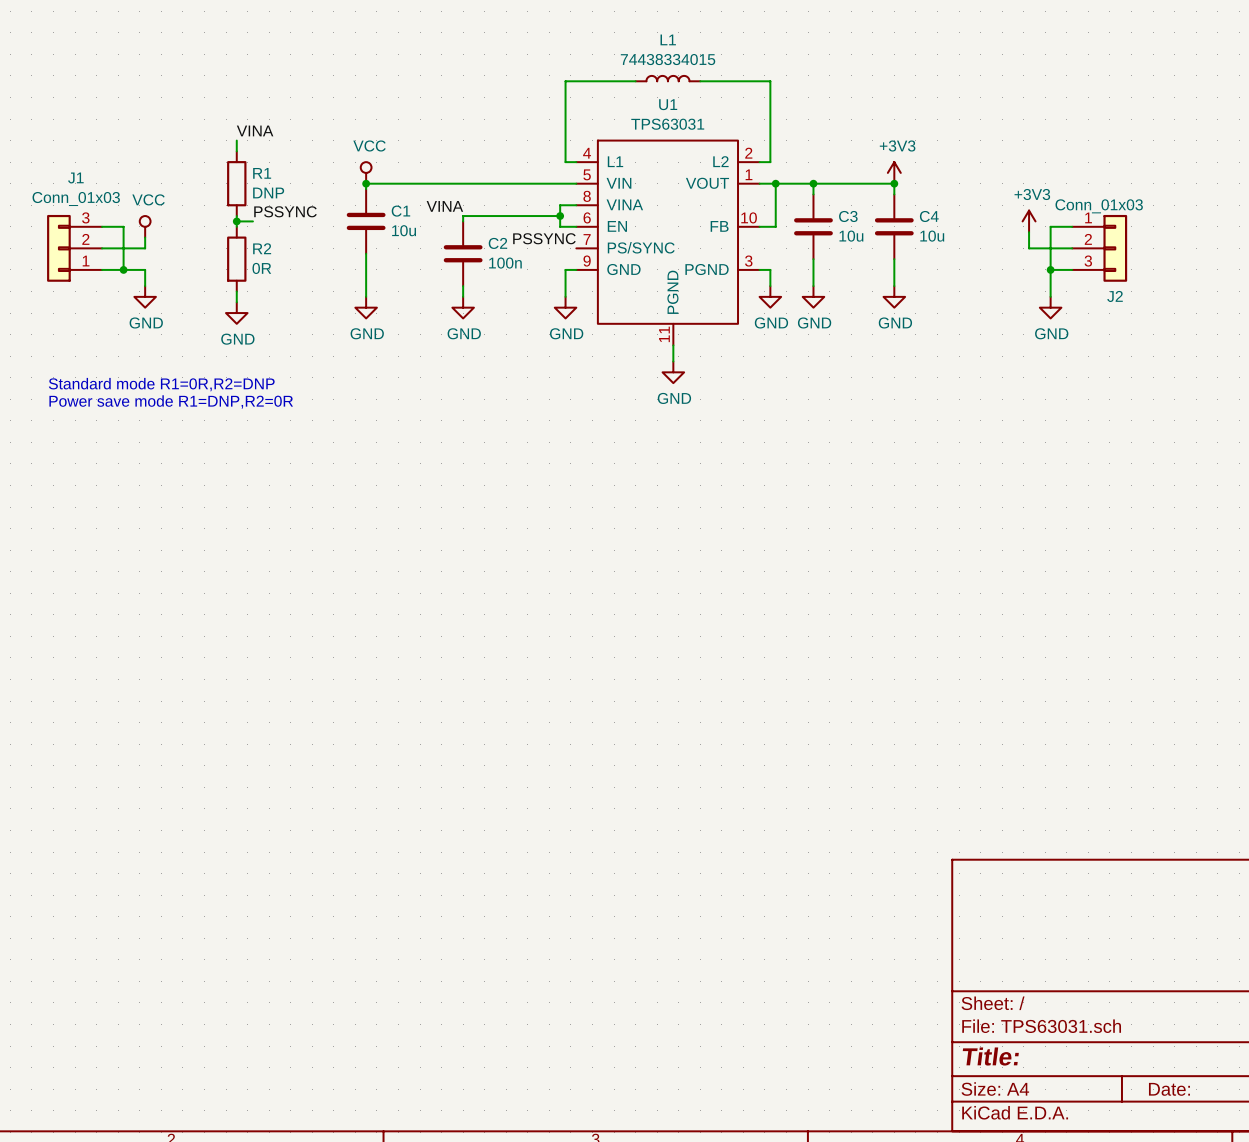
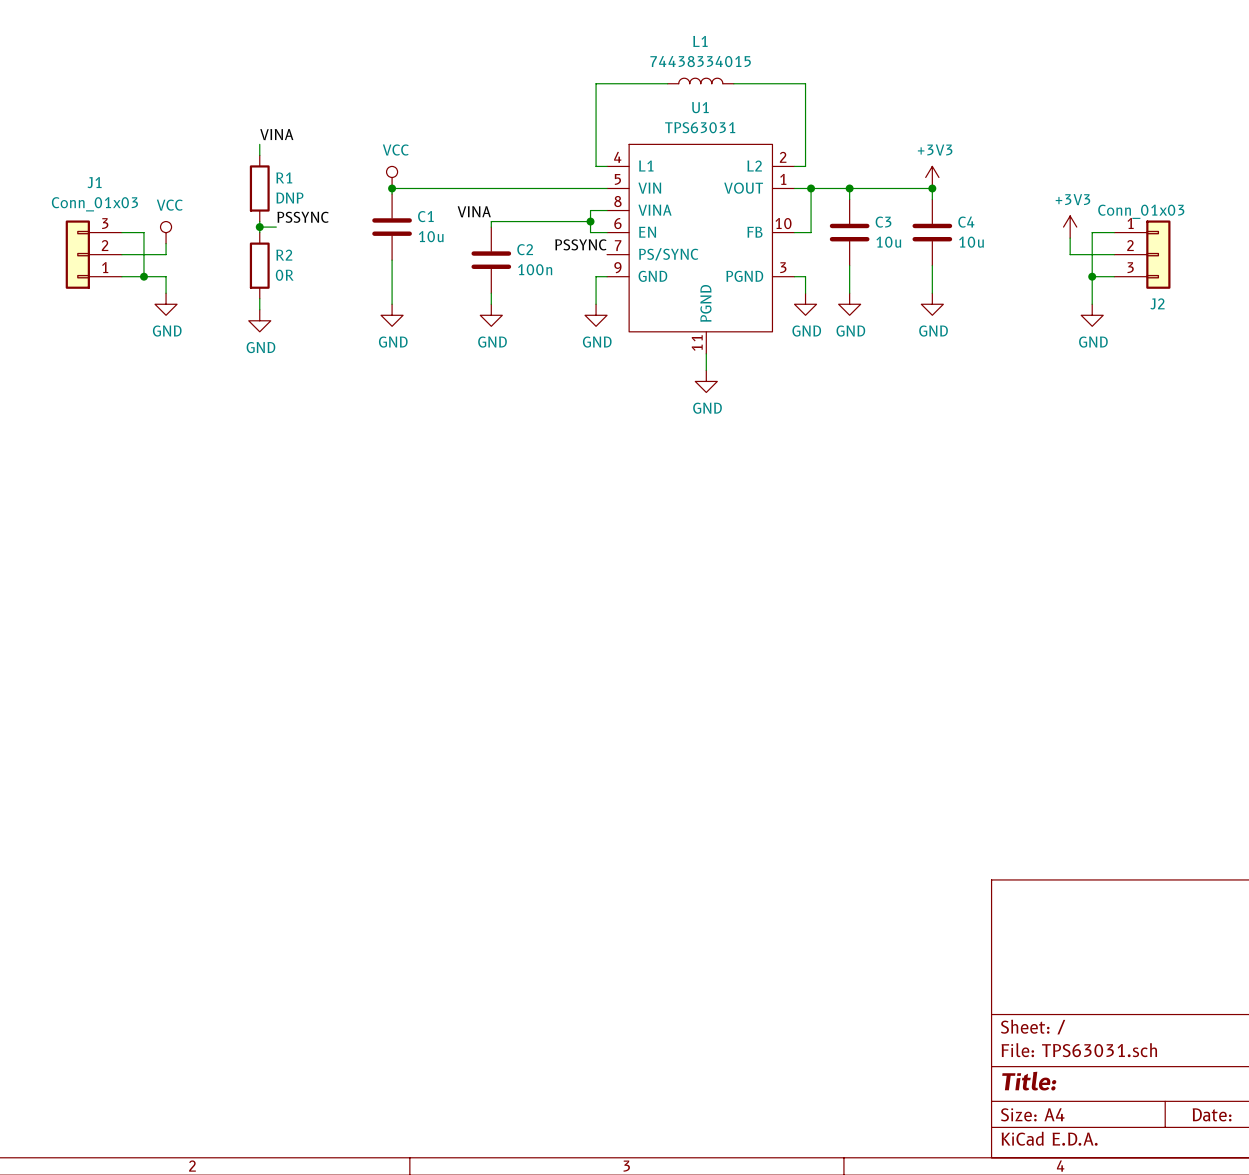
text: Standard mode R1=0R,R2=DNP (161, 384) -> none
text: Power save mode R1=DNP,R2=0R (171, 401) -> none

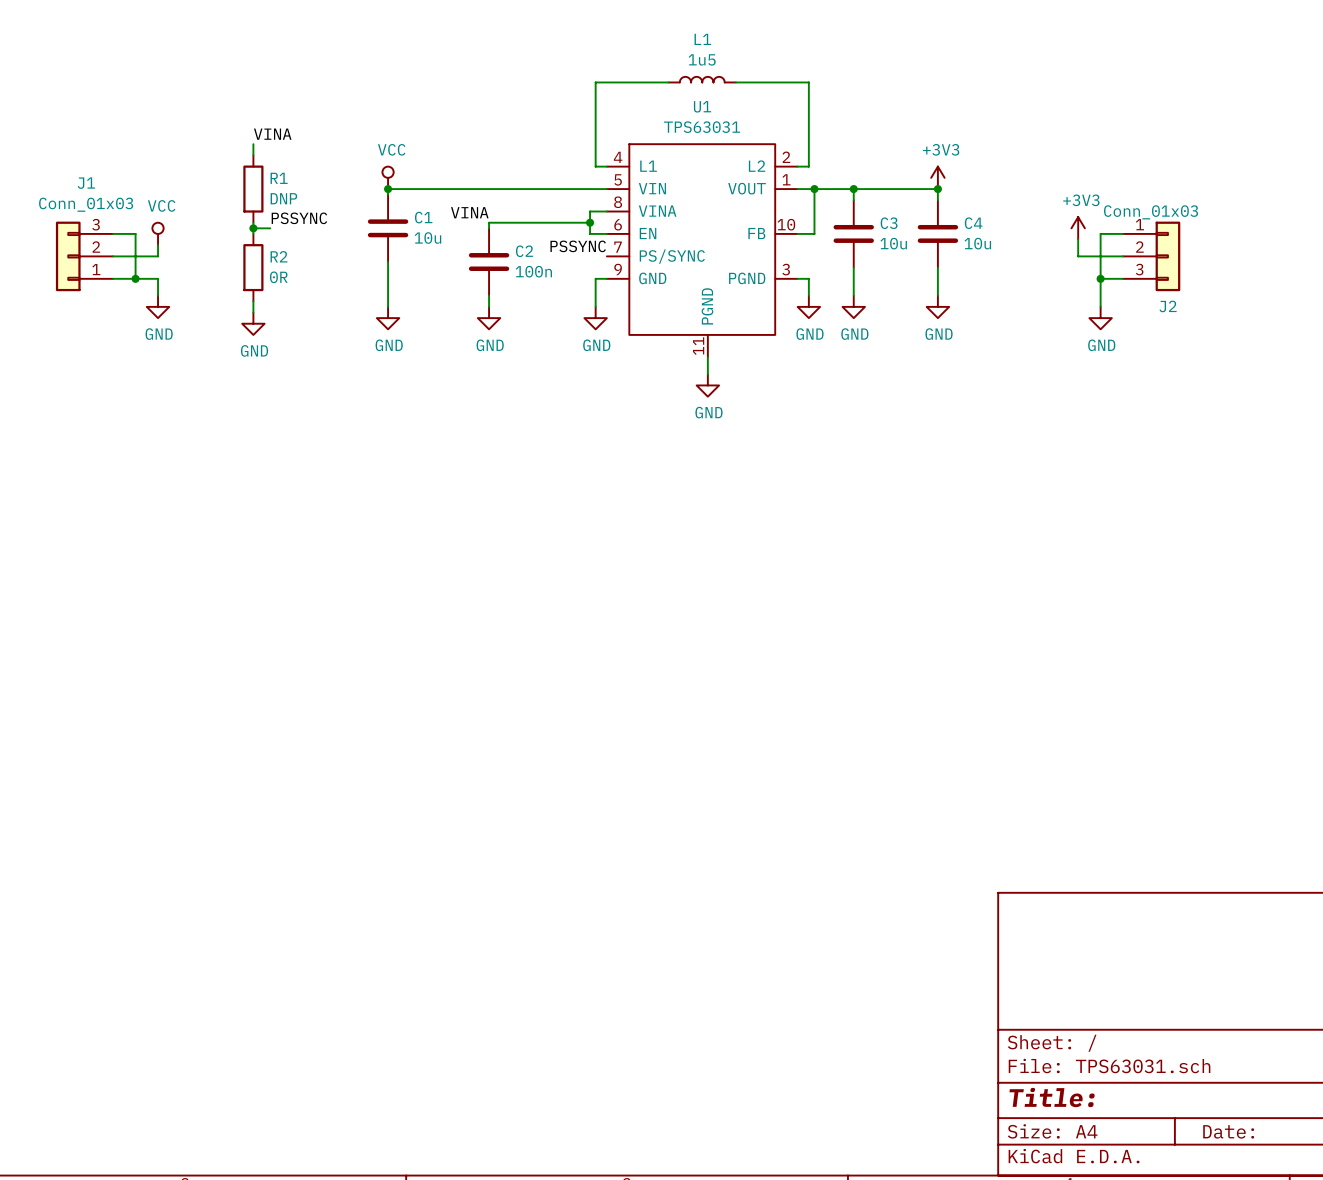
L1 value: 74438334015 (700, 61) -> 1u5 (702, 59)

